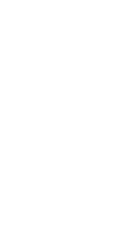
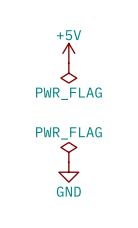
power symbol: none -> +5V (68, 53)
power symbol: none -> PWR_FLAG (68, 73)
power symbol: none -> PWR_FLAG (68, 152)
power symbol: none -> GND (68, 172)

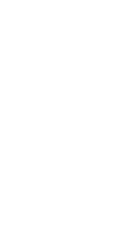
power symbol: +5V (68, 53) -> none
power symbol: PWR_FLAG (68, 73) -> none
power symbol: PWR_FLAG (68, 152) -> none
power symbol: GND (68, 172) -> none

